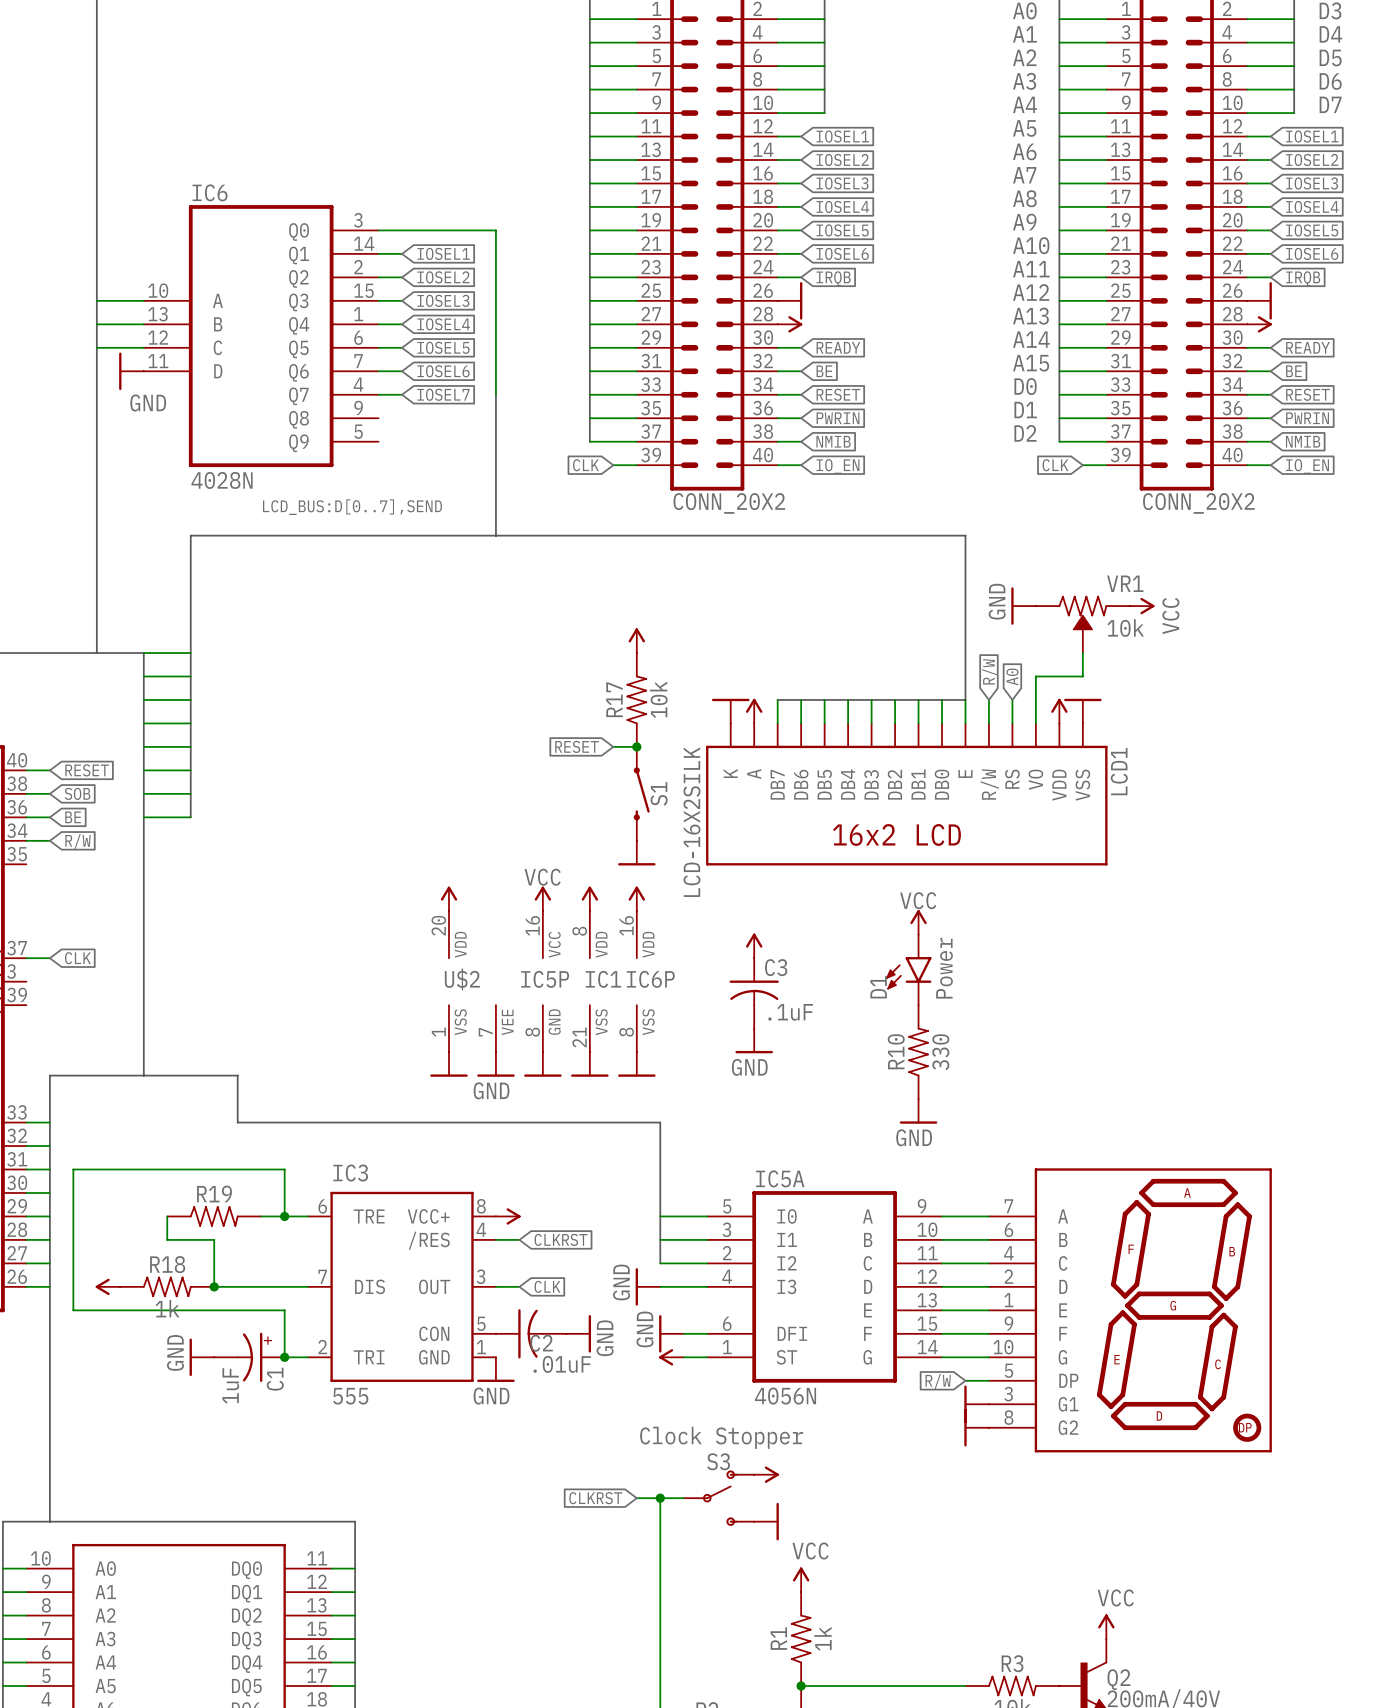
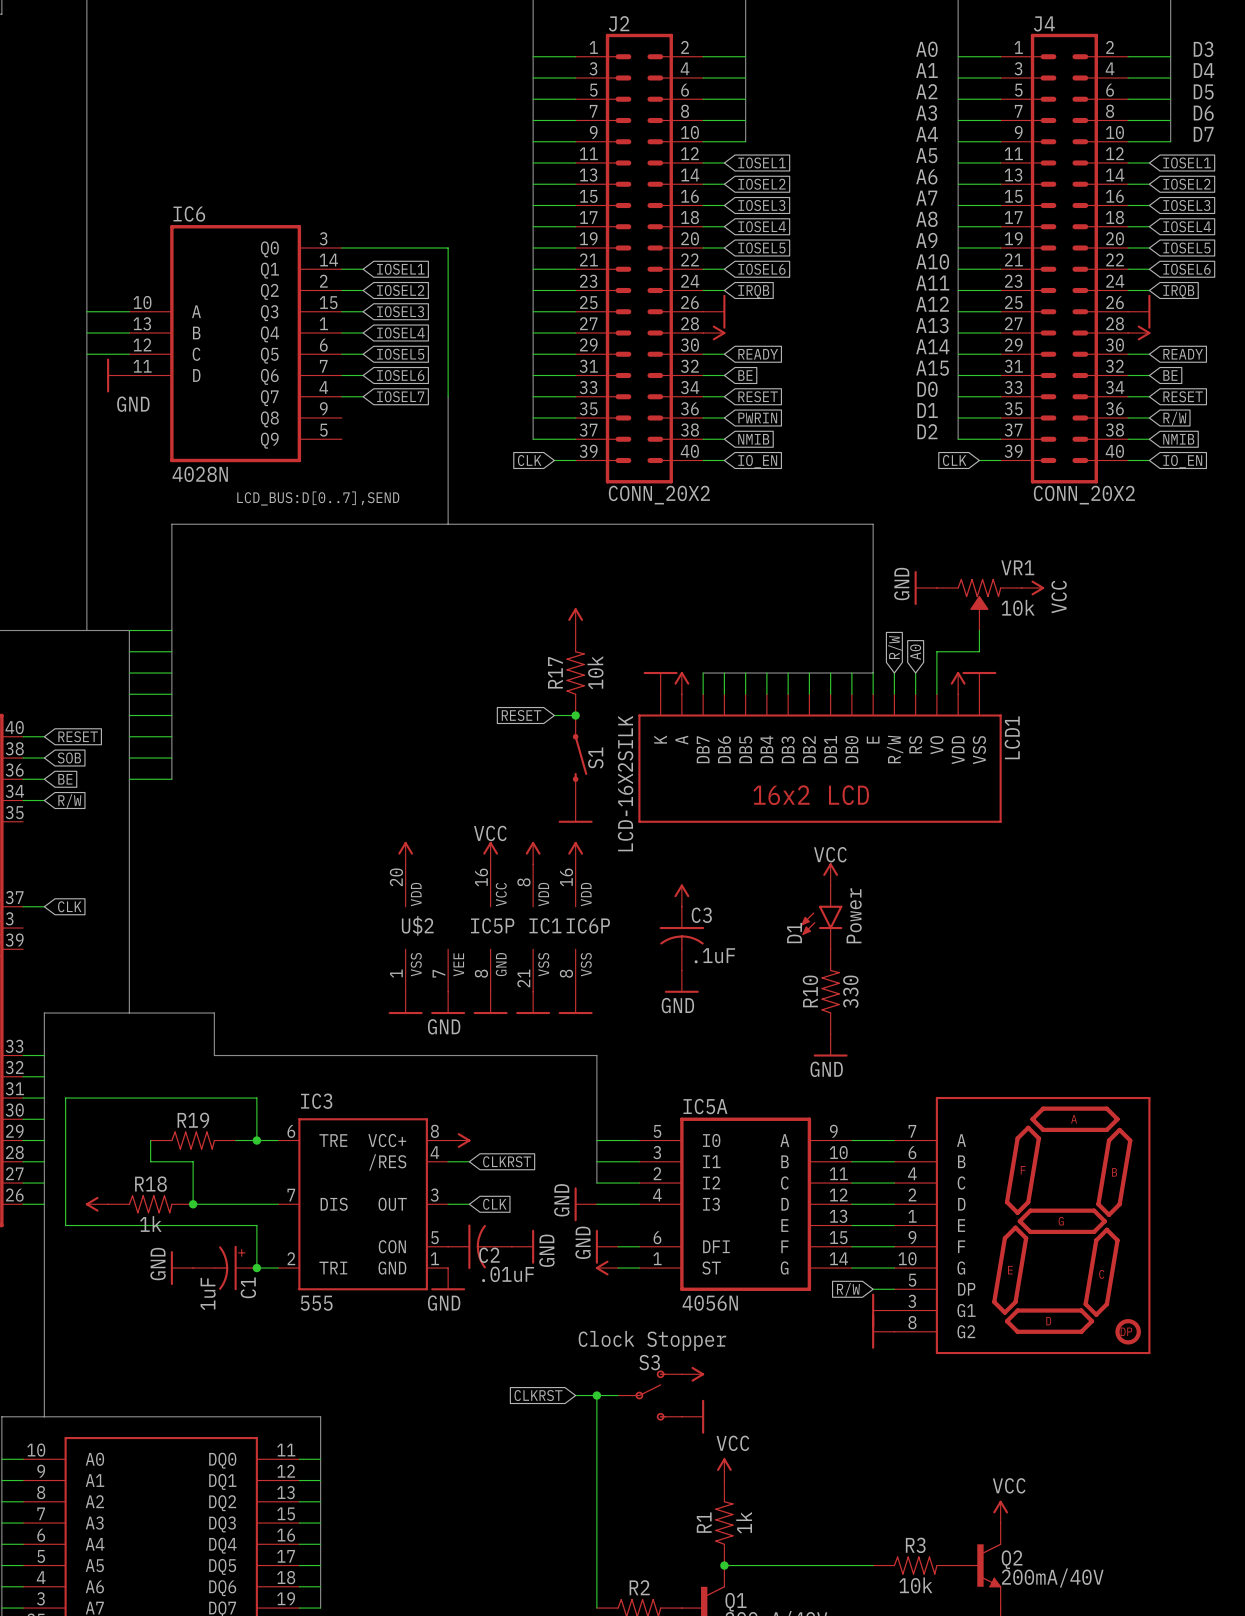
global label: PWRIN (1307, 418) -> R/W (1174, 418)

